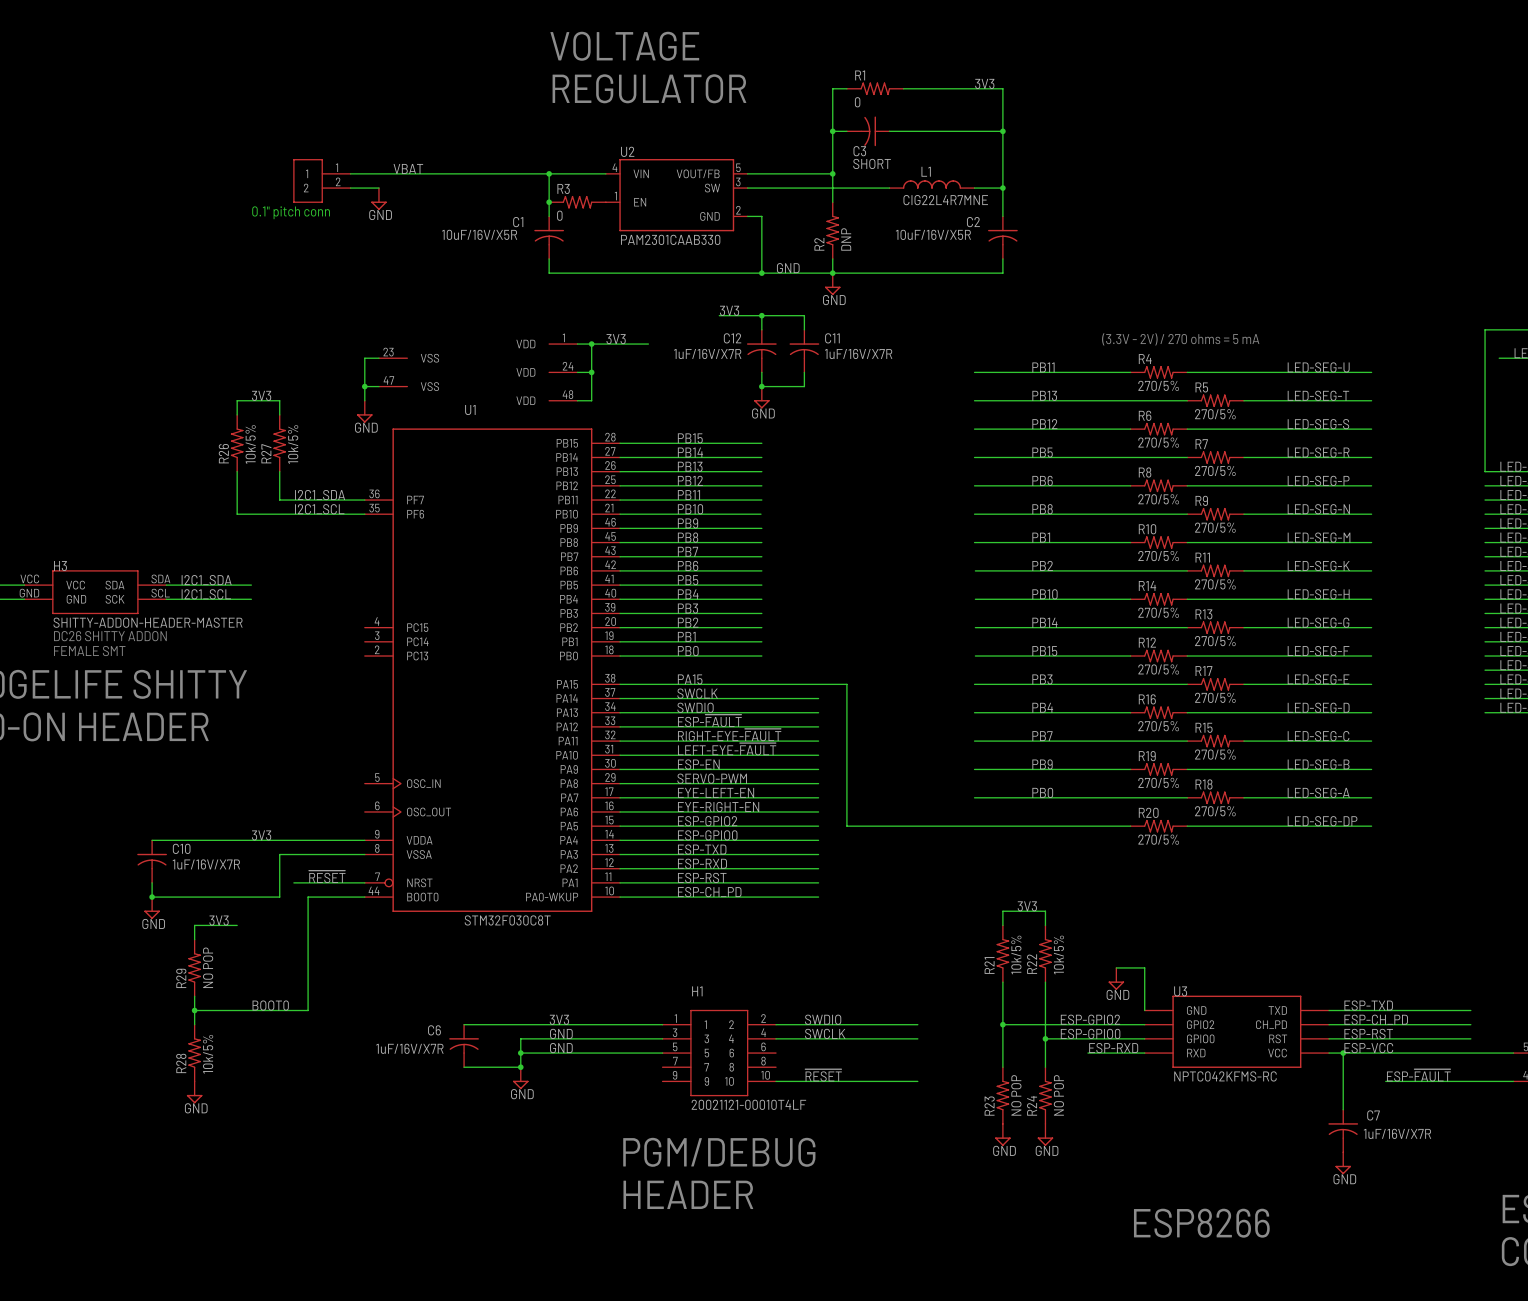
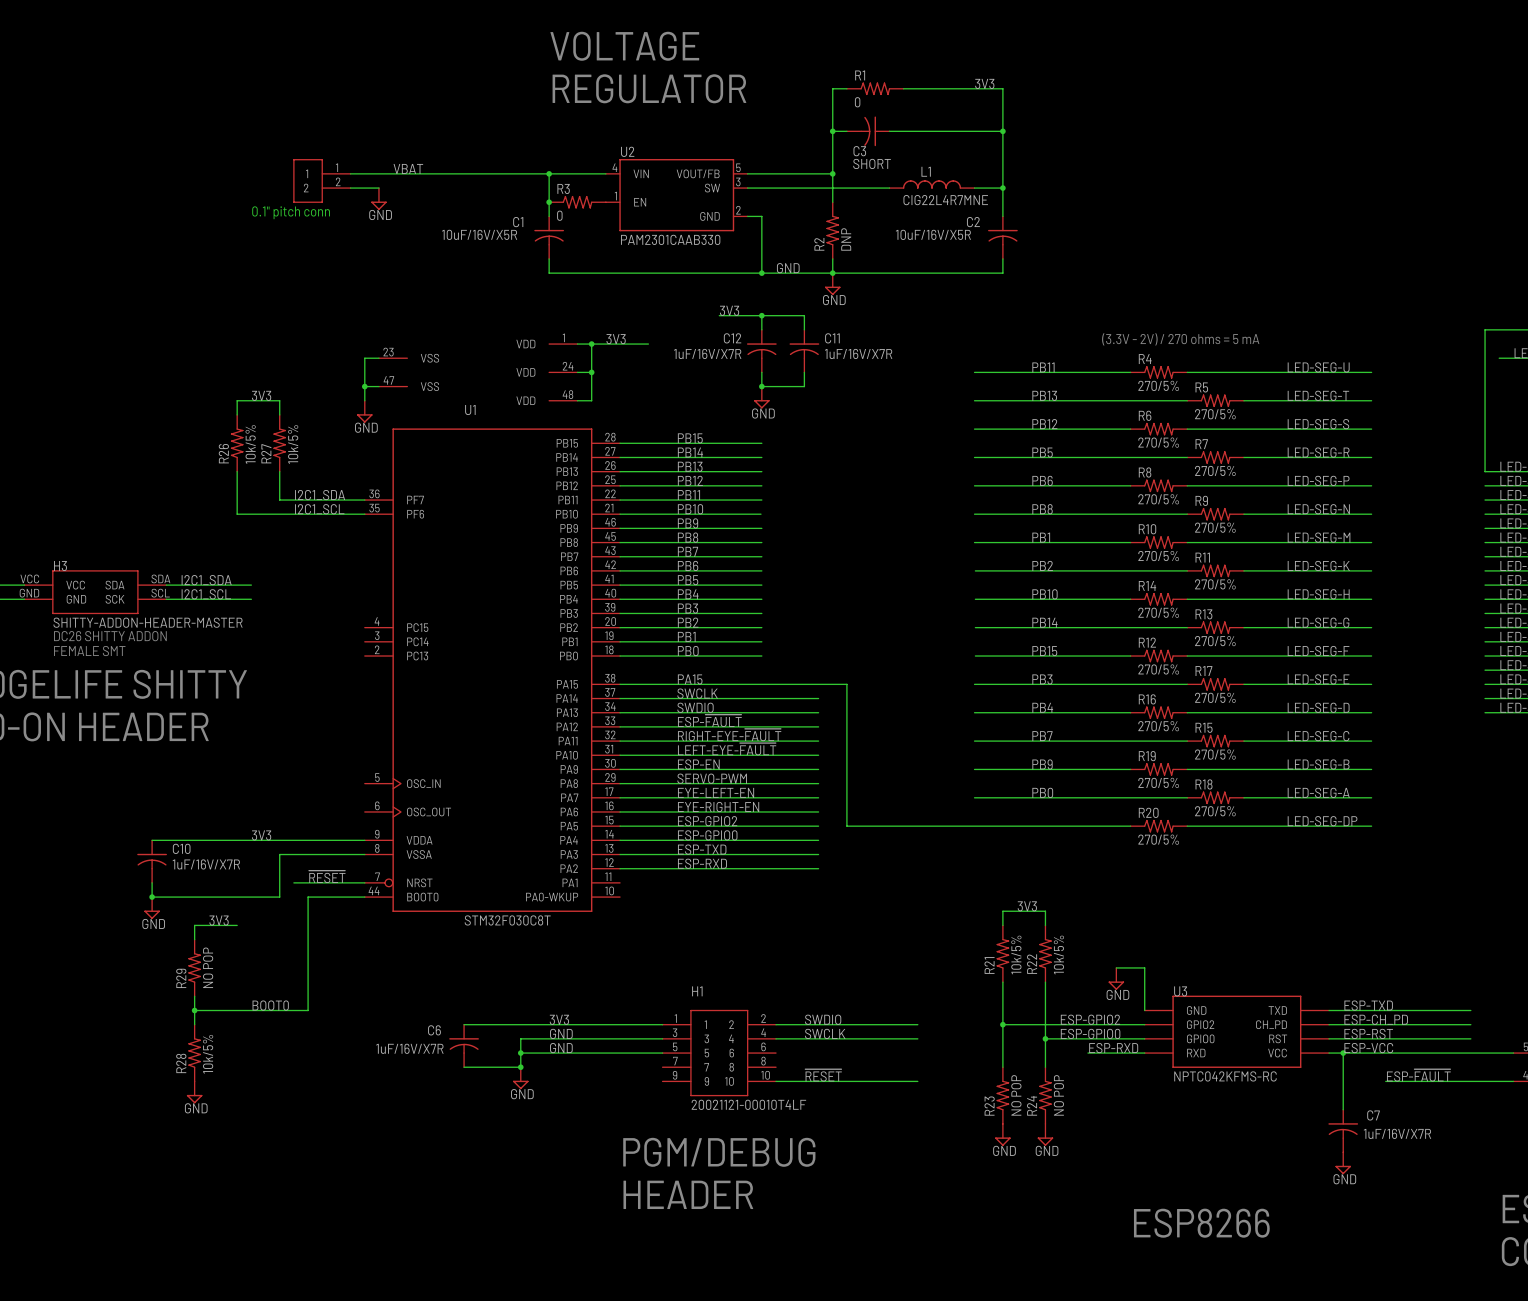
label: ESP-RST (702, 877) -> none
wire: (620, 882) (818, 882) -> none
label: ESP-CH_PD (709, 892) -> none
wire: (620, 897) (818, 897) -> none

